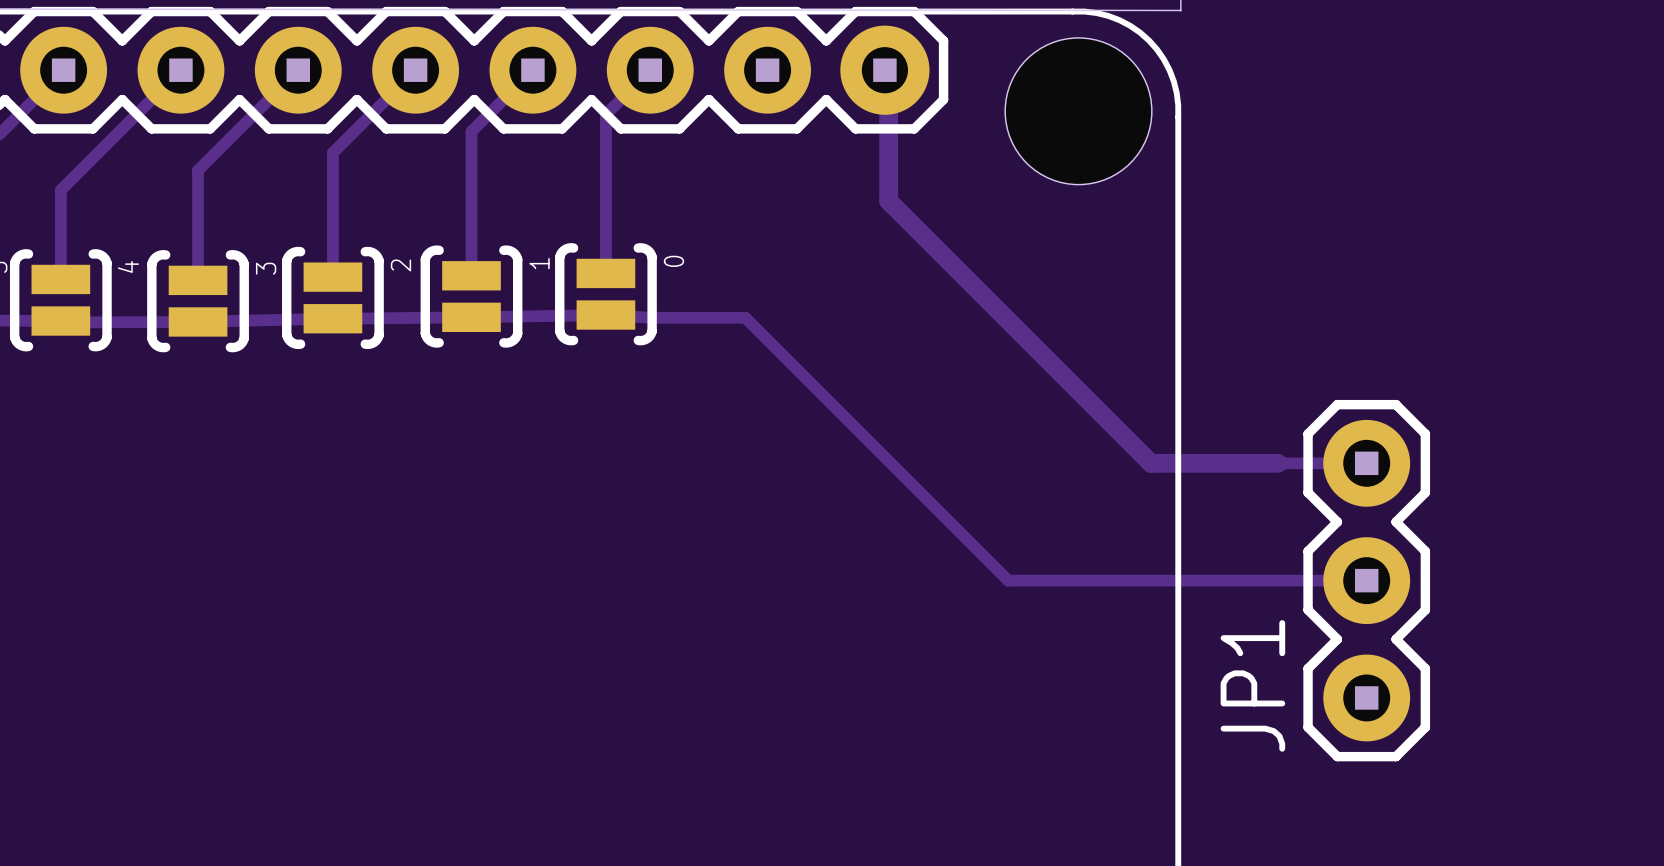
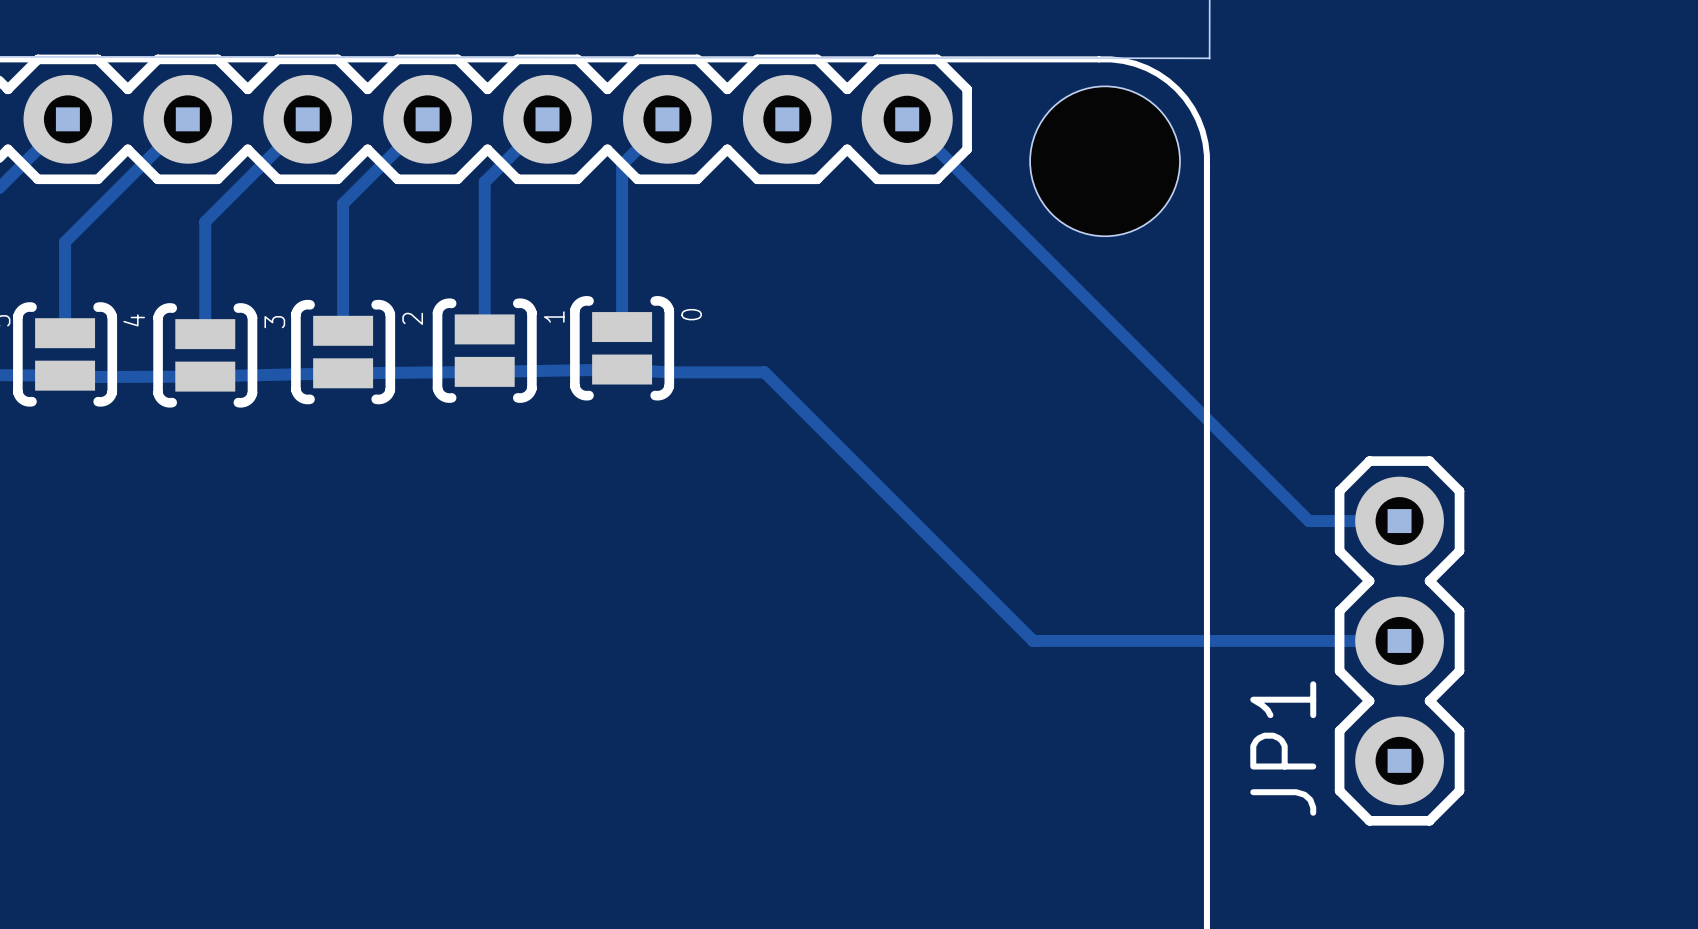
track: (888, 73) (888, 200) (1150, 463) (1278, 463) -> (910, 123) (1308, 521)

